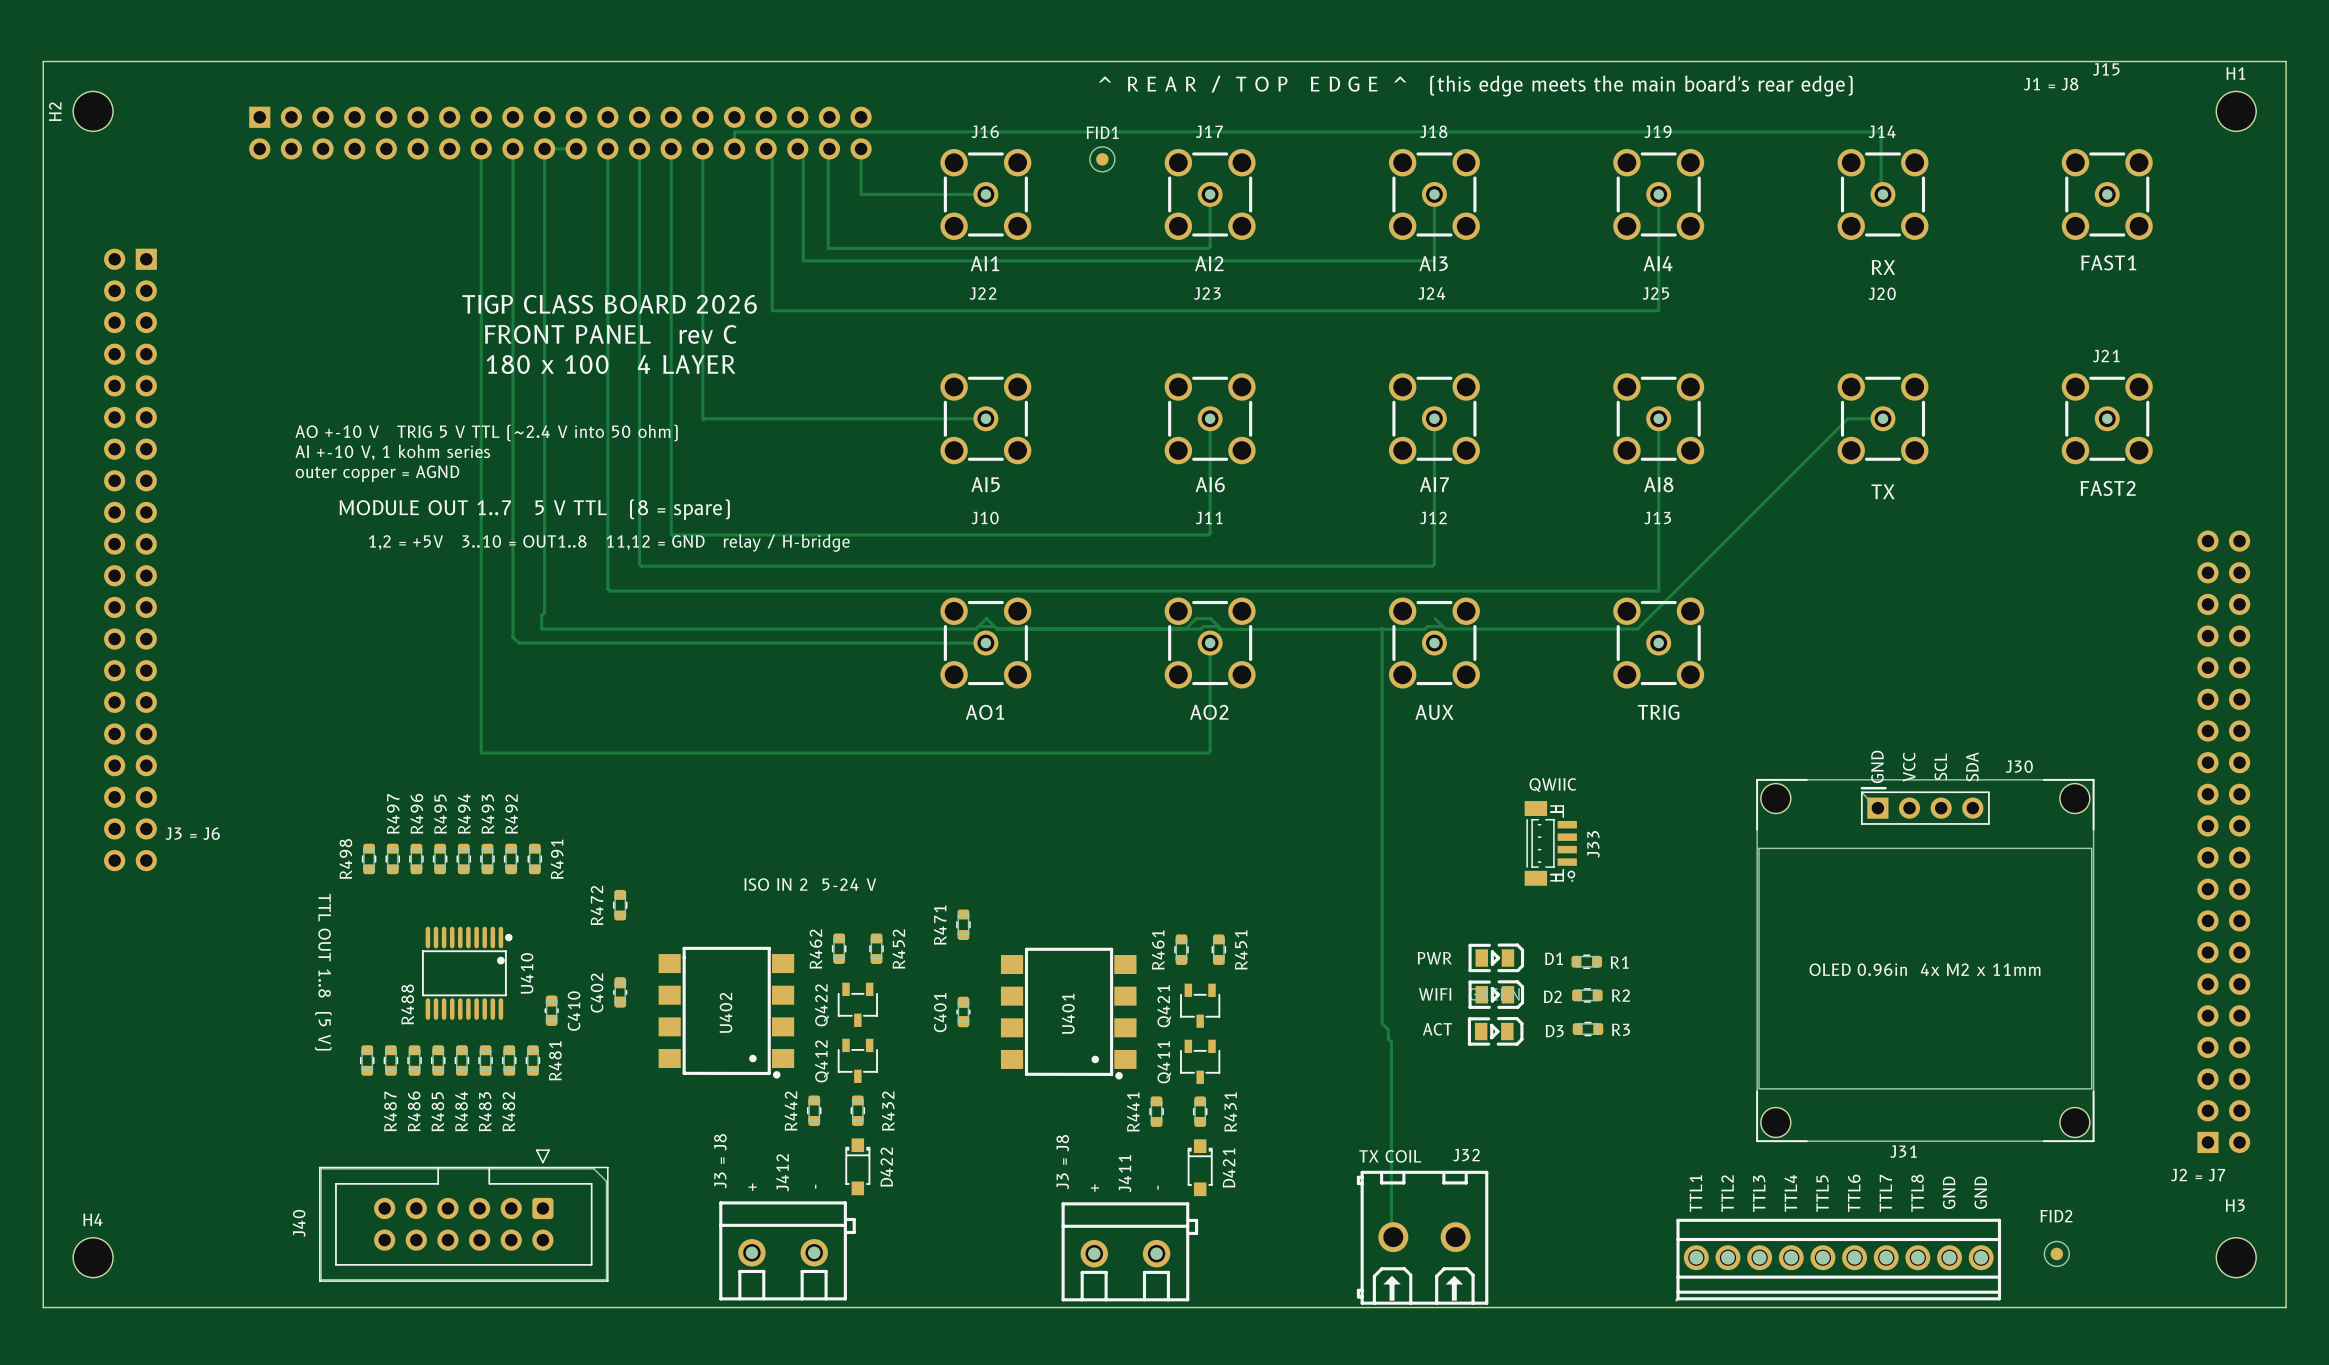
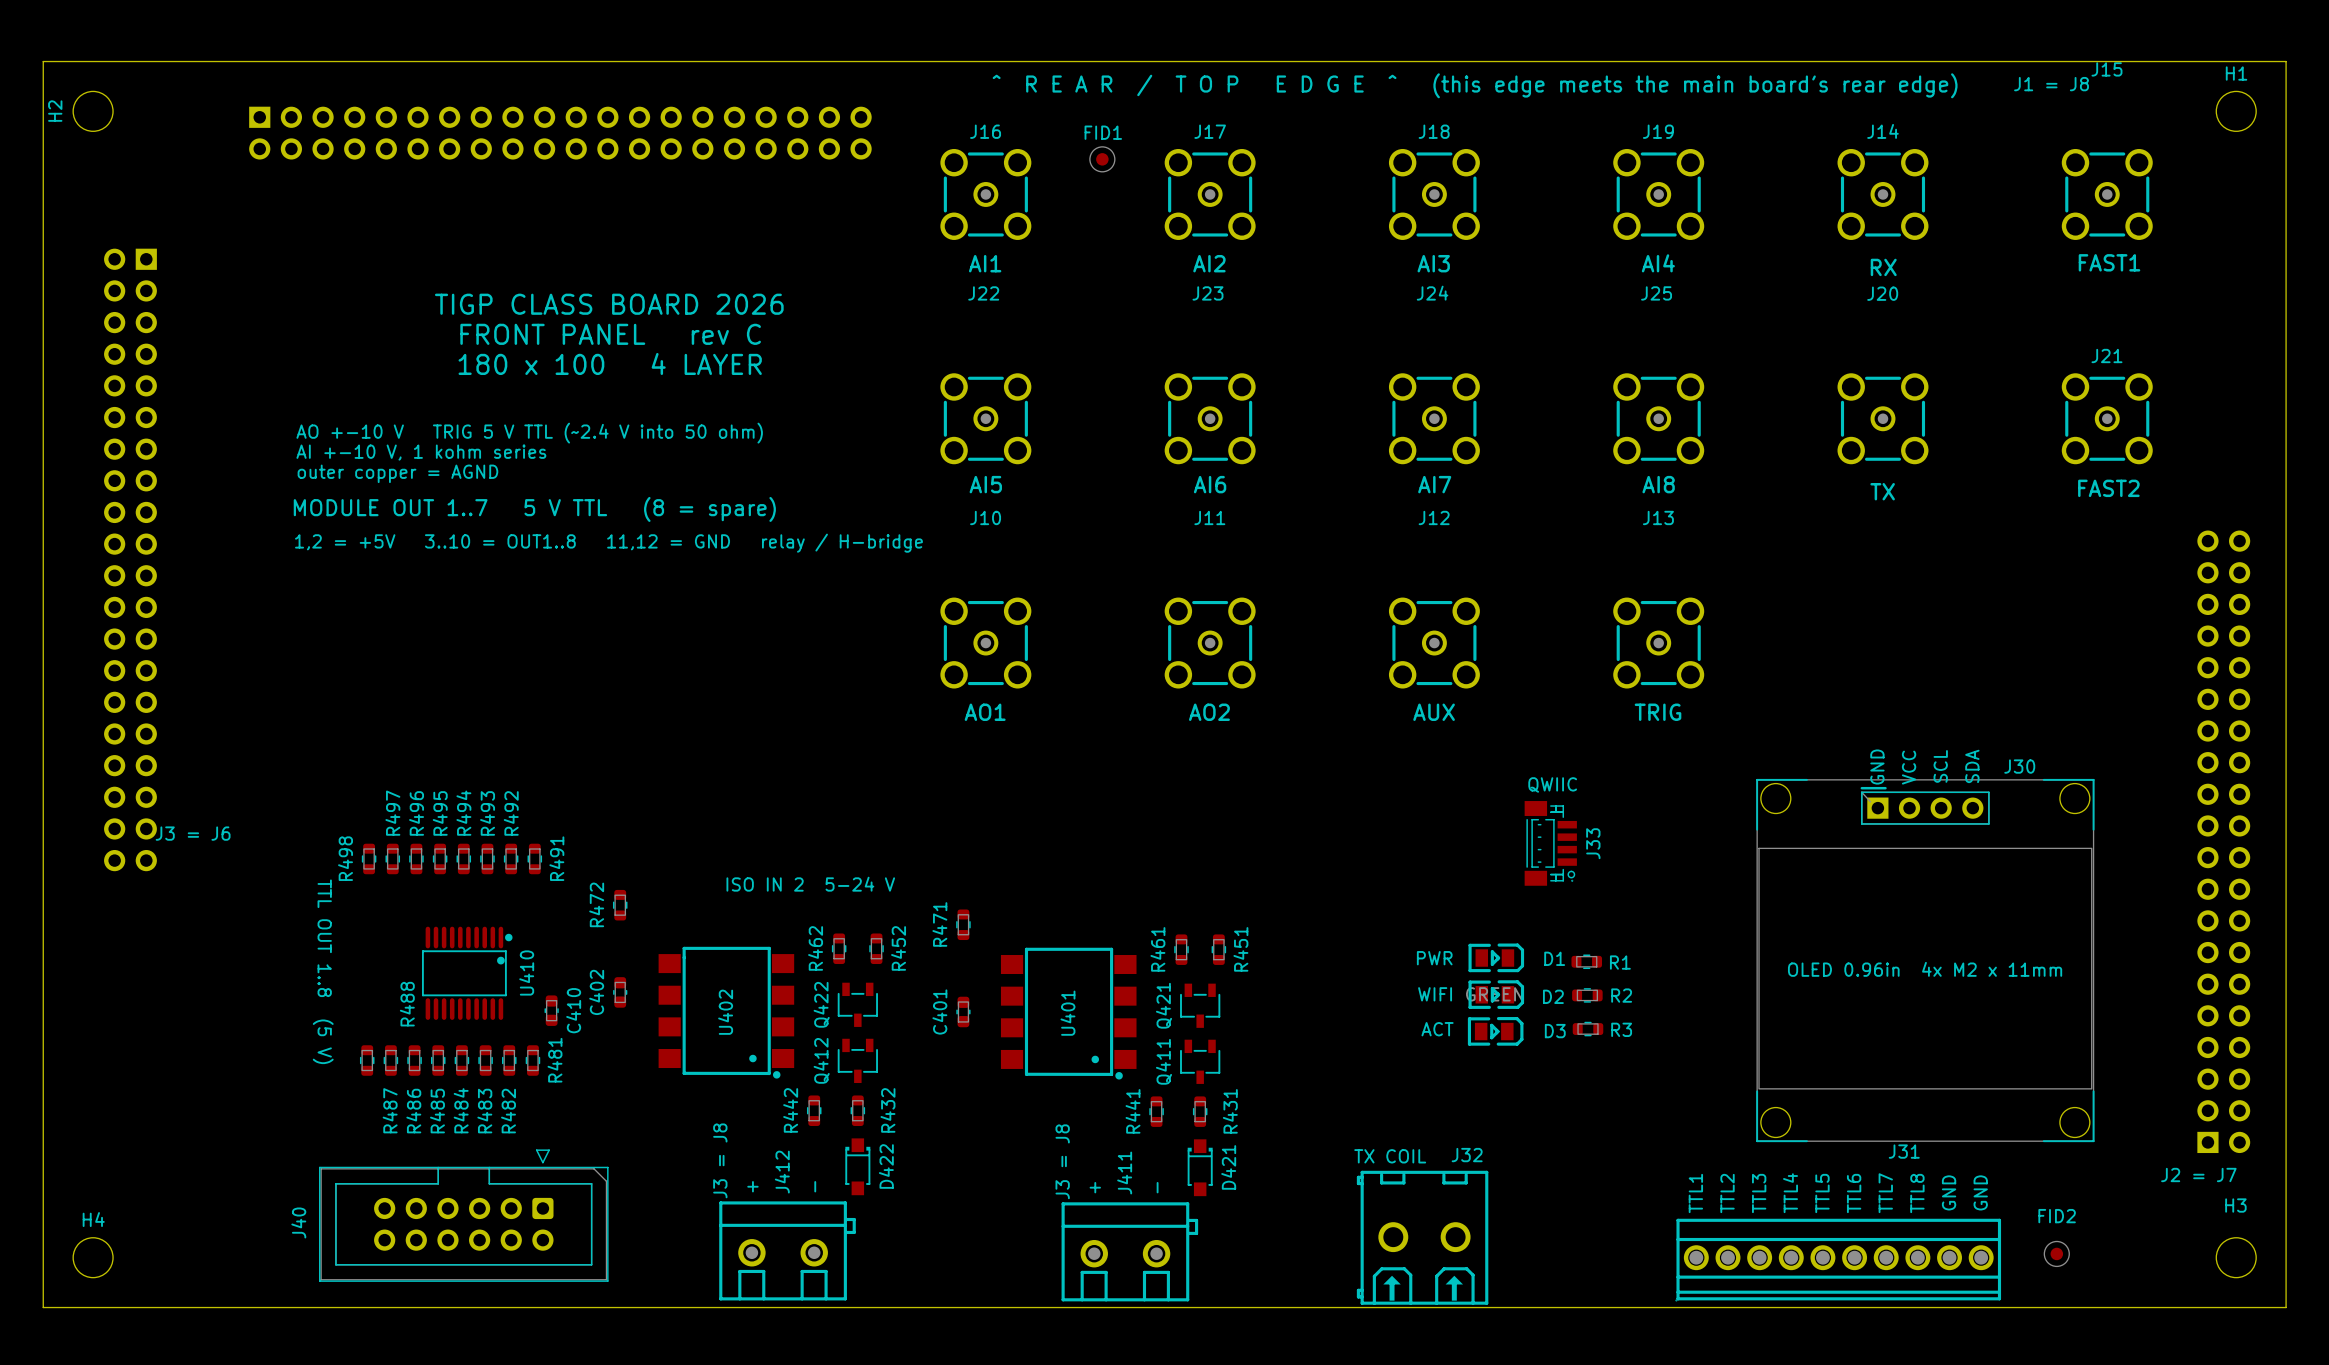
track: (481, 148) (481, 753) (1208, 753) (1210, 751) (1210, 643) -> none
track: (512, 148) (512, 637) (518, 643) (985, 643) -> none
track: (576, 148) (544, 148) (544, 612) (541, 615) (542, 629) (976, 629) (986, 618) (996, 629) (1200, 629) (1203, 626) (1216, 626) (1219, 629) (1424, 629) (1427, 626) (1443, 626) -> none
track: (607, 148) (607, 588) (610, 591) (1658, 591) (1658, 418) -> none
track: (639, 148) (639, 564) (641, 566) (1432, 566) (1434, 564) (1434, 418) -> none
track: (671, 148) (672, 535) (1208, 535) (1210, 533) (1210, 418) -> none
track: (702, 148) (703, 419) (985, 418) -> none
track: (734, 148) (734, 131) (1881, 131) (1881, 192) (1882, 194) -> none
track: (766, 148) (772, 154) (772, 310) (1658, 310) (1658, 194) (1663, 198) -> none
track: (797, 148) (803, 154) (803, 260) (1434, 260) (1434, 194) -> none
track: (829, 148) (828, 248) (1208, 248) (1210, 246) (1210, 194) -> none
track: (861, 148) (861, 194) (985, 194) -> none
track: (1882, 418) (1847, 418) (1637, 629) (1445, 629) (1435, 618) -> none
track: (994, 626) (979, 626) (976, 629) -> none
track: (1382, 627) (1382, 1023) (1388, 1029) (1388, 1039) (1391, 1042) (1391, 1222) -> none
track: (1185, 629) (1196, 618) (1210, 618) (1221, 629) -> none

